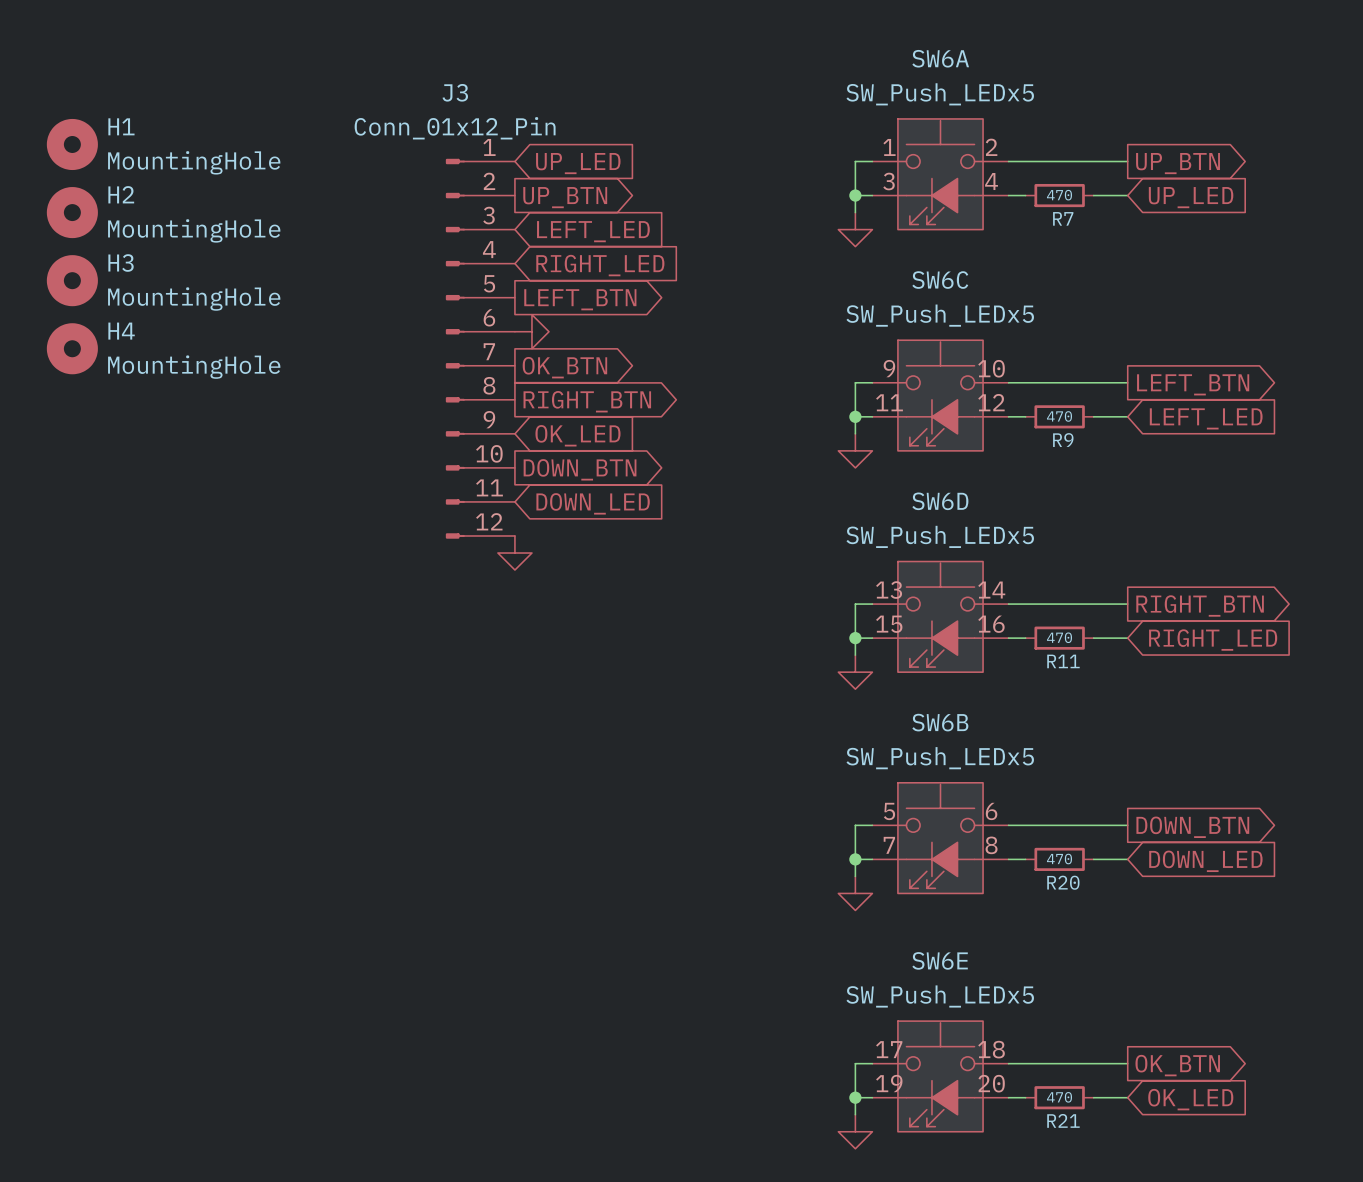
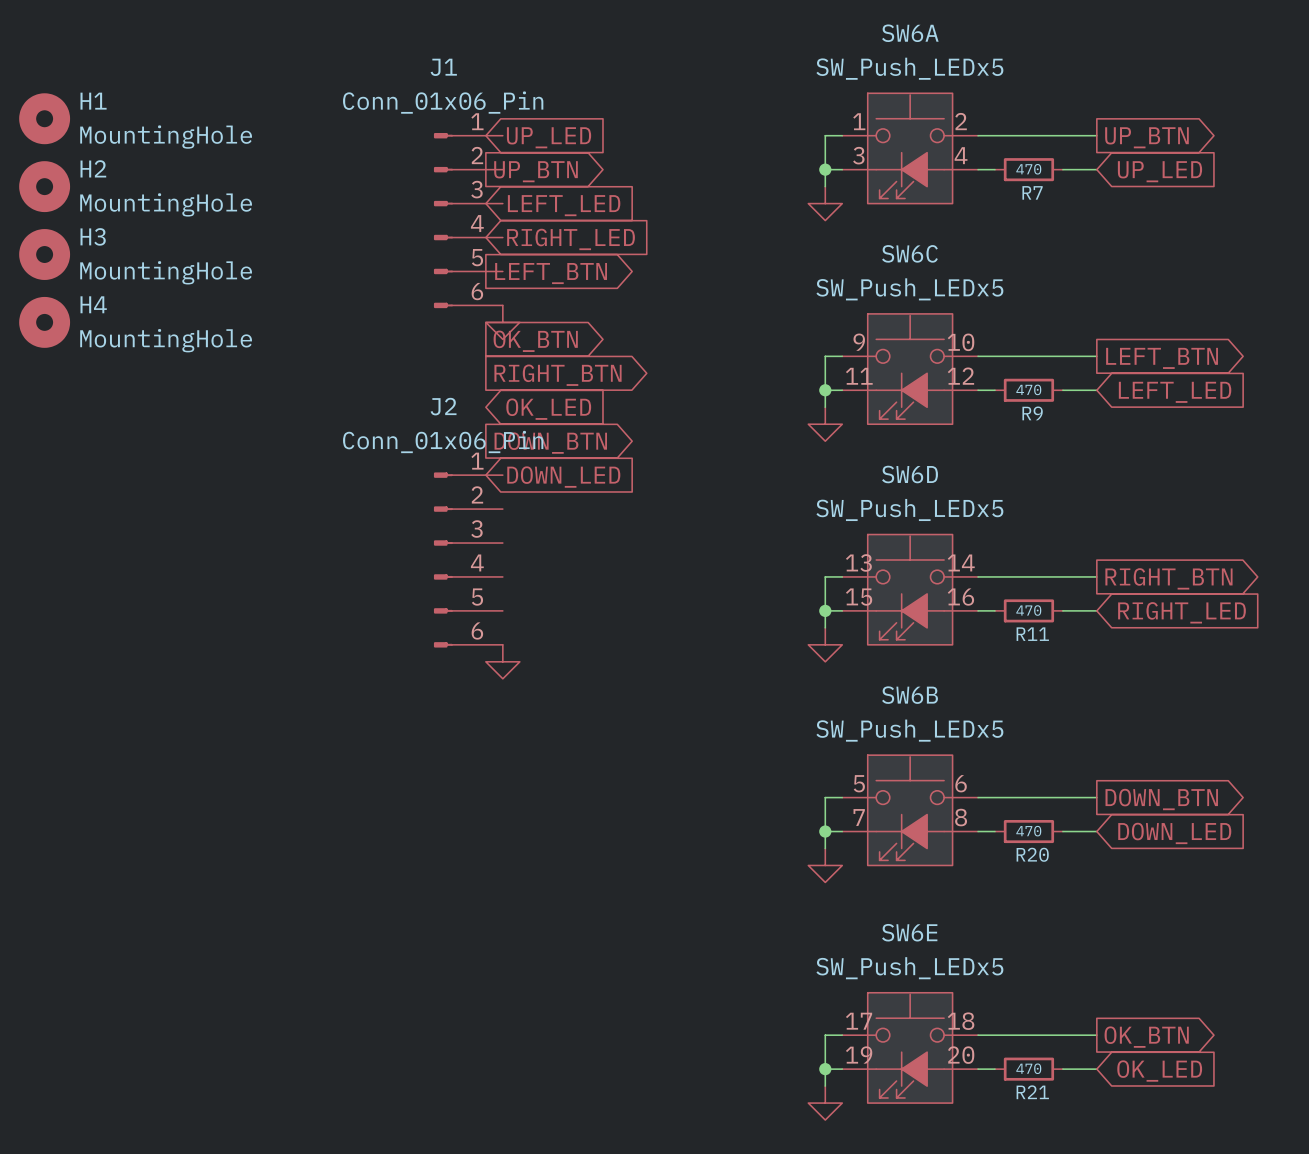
J1: none -> Conn_01x06_Pin (468, 220)
power symbol rotation: 0° (531, 331) -> 90° clockwise (502, 322)
J3: Conn_01x12_Pin (480, 348) -> none
power symbol: (514, 553) -> none
J2: none -> Conn_01x06_Pin (468, 559)
power symbol: none -> (502, 661)

